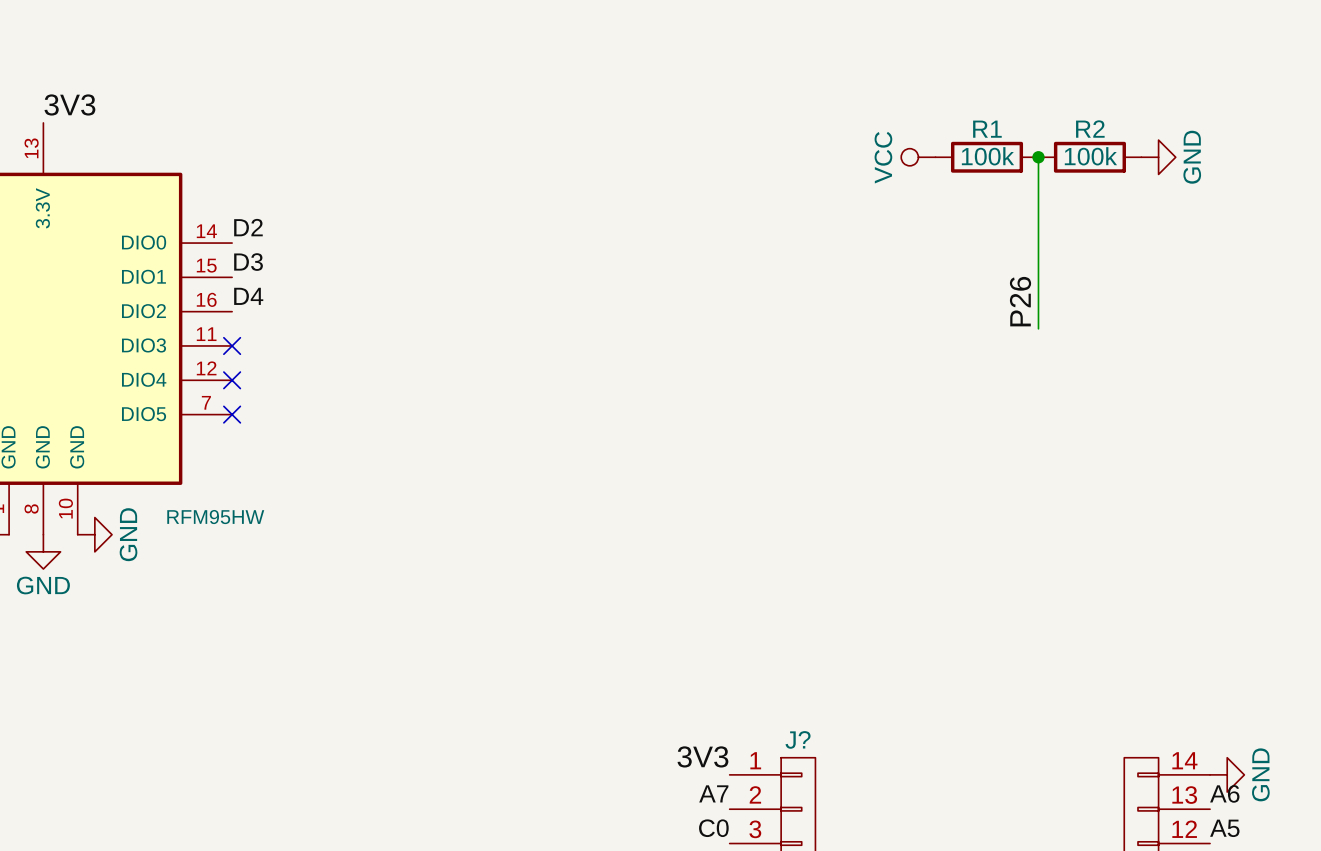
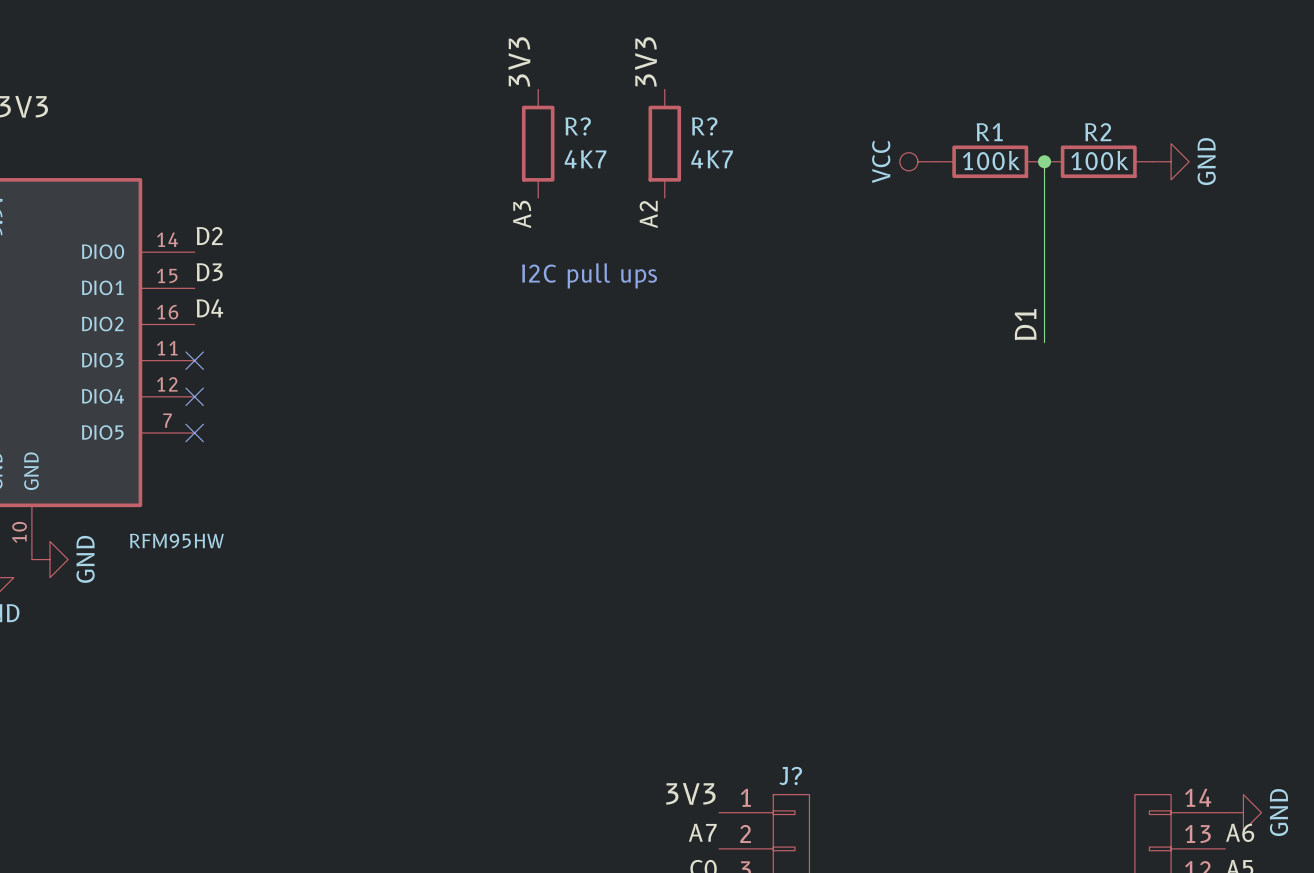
label: none -> 3V3 (519, 61)
label: none -> 3V3 (646, 61)
R?: none -> 4K7 (538, 143)
R?: none -> 4K7 (664, 143)
label: none -> A3 (522, 214)
label: none -> A2 (648, 214)
text: none -> I2C pull ups (589, 275)
label: P26 (1020, 301) -> D1 (1025, 324)

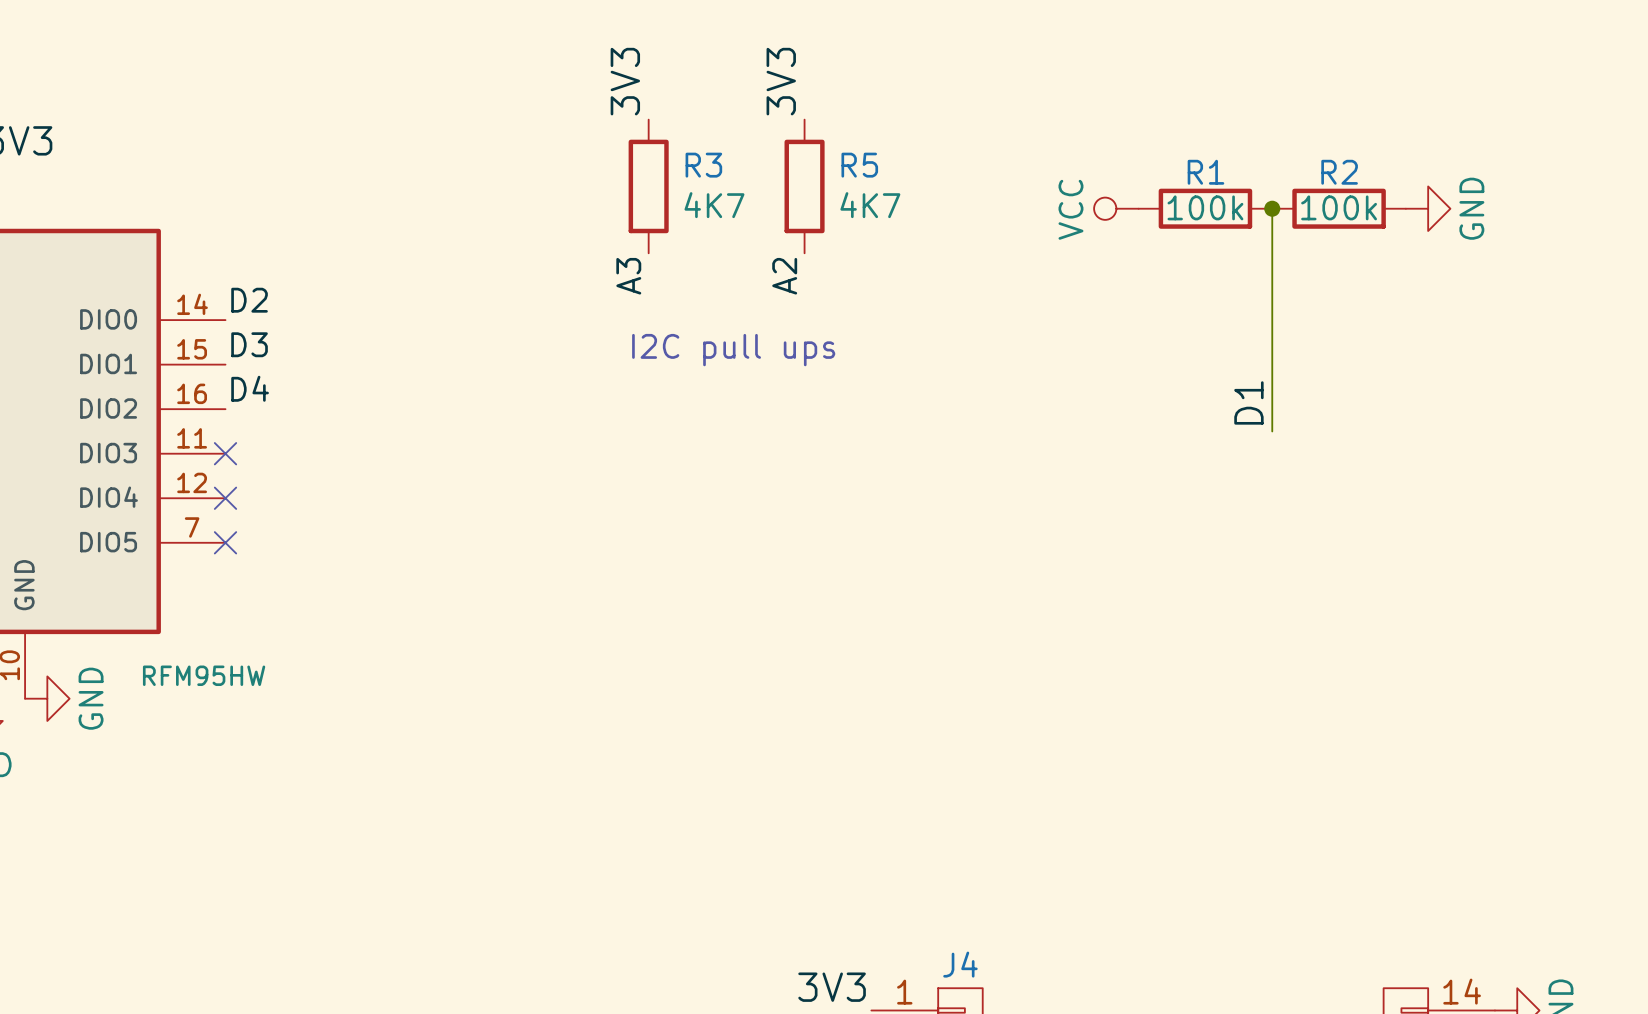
R? name: R? (578, 126) -> R3 (703, 165)
R? name: R? (704, 126) -> R5 (859, 165)
J? name: J? (790, 775) -> J4 (960, 964)

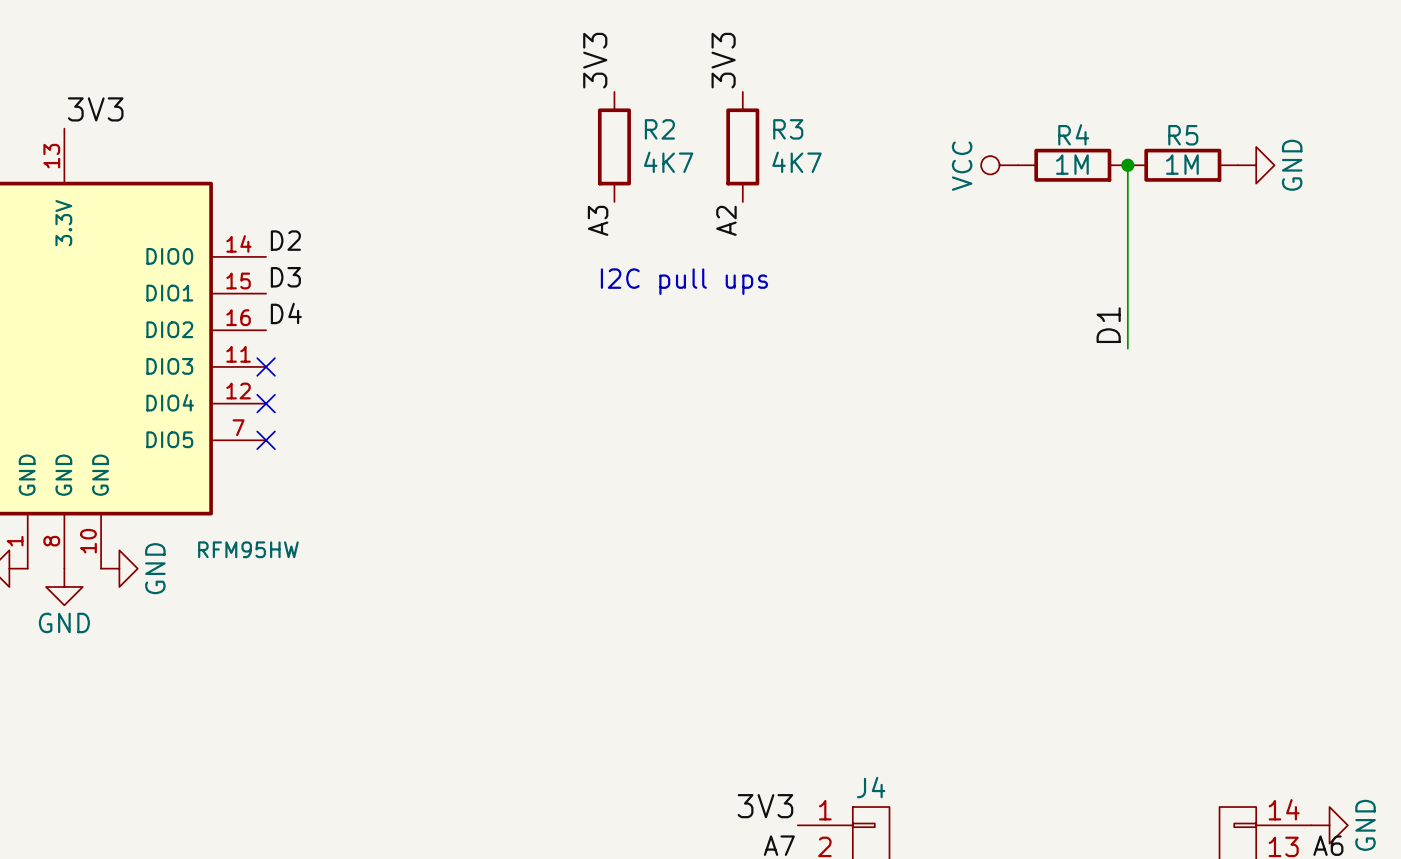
R3 name: R3 (703, 165) -> R2 (659, 129)
R5 name: R5 (859, 165) -> R3 (788, 129)
R1 name: R1 (1205, 172) -> R4 (1073, 134)
R2 name: R2 (1339, 172) -> R5 (1183, 135)
R1 value: 100k (1205, 207) -> 1M (1072, 164)
R2 value: 100k (1339, 207) -> 1M (1182, 164)

